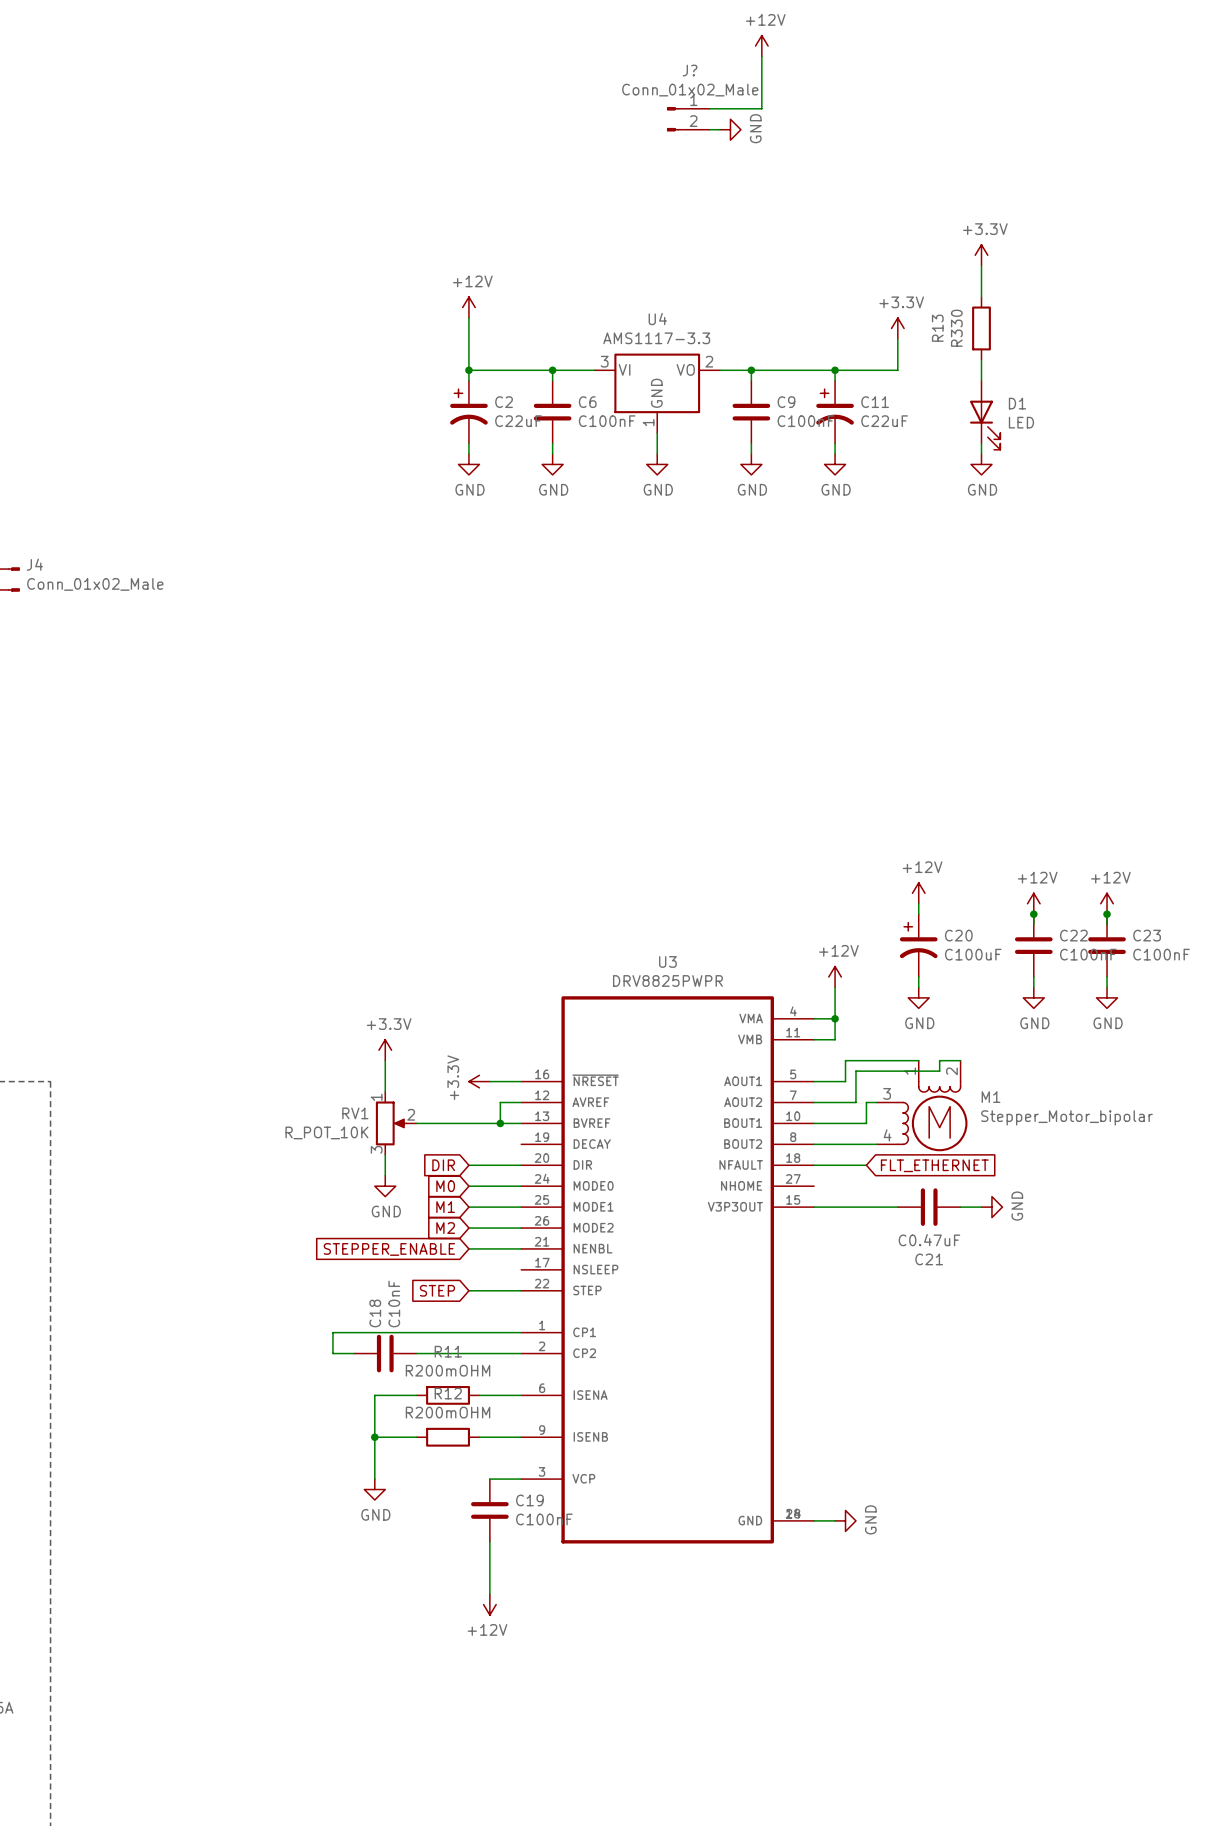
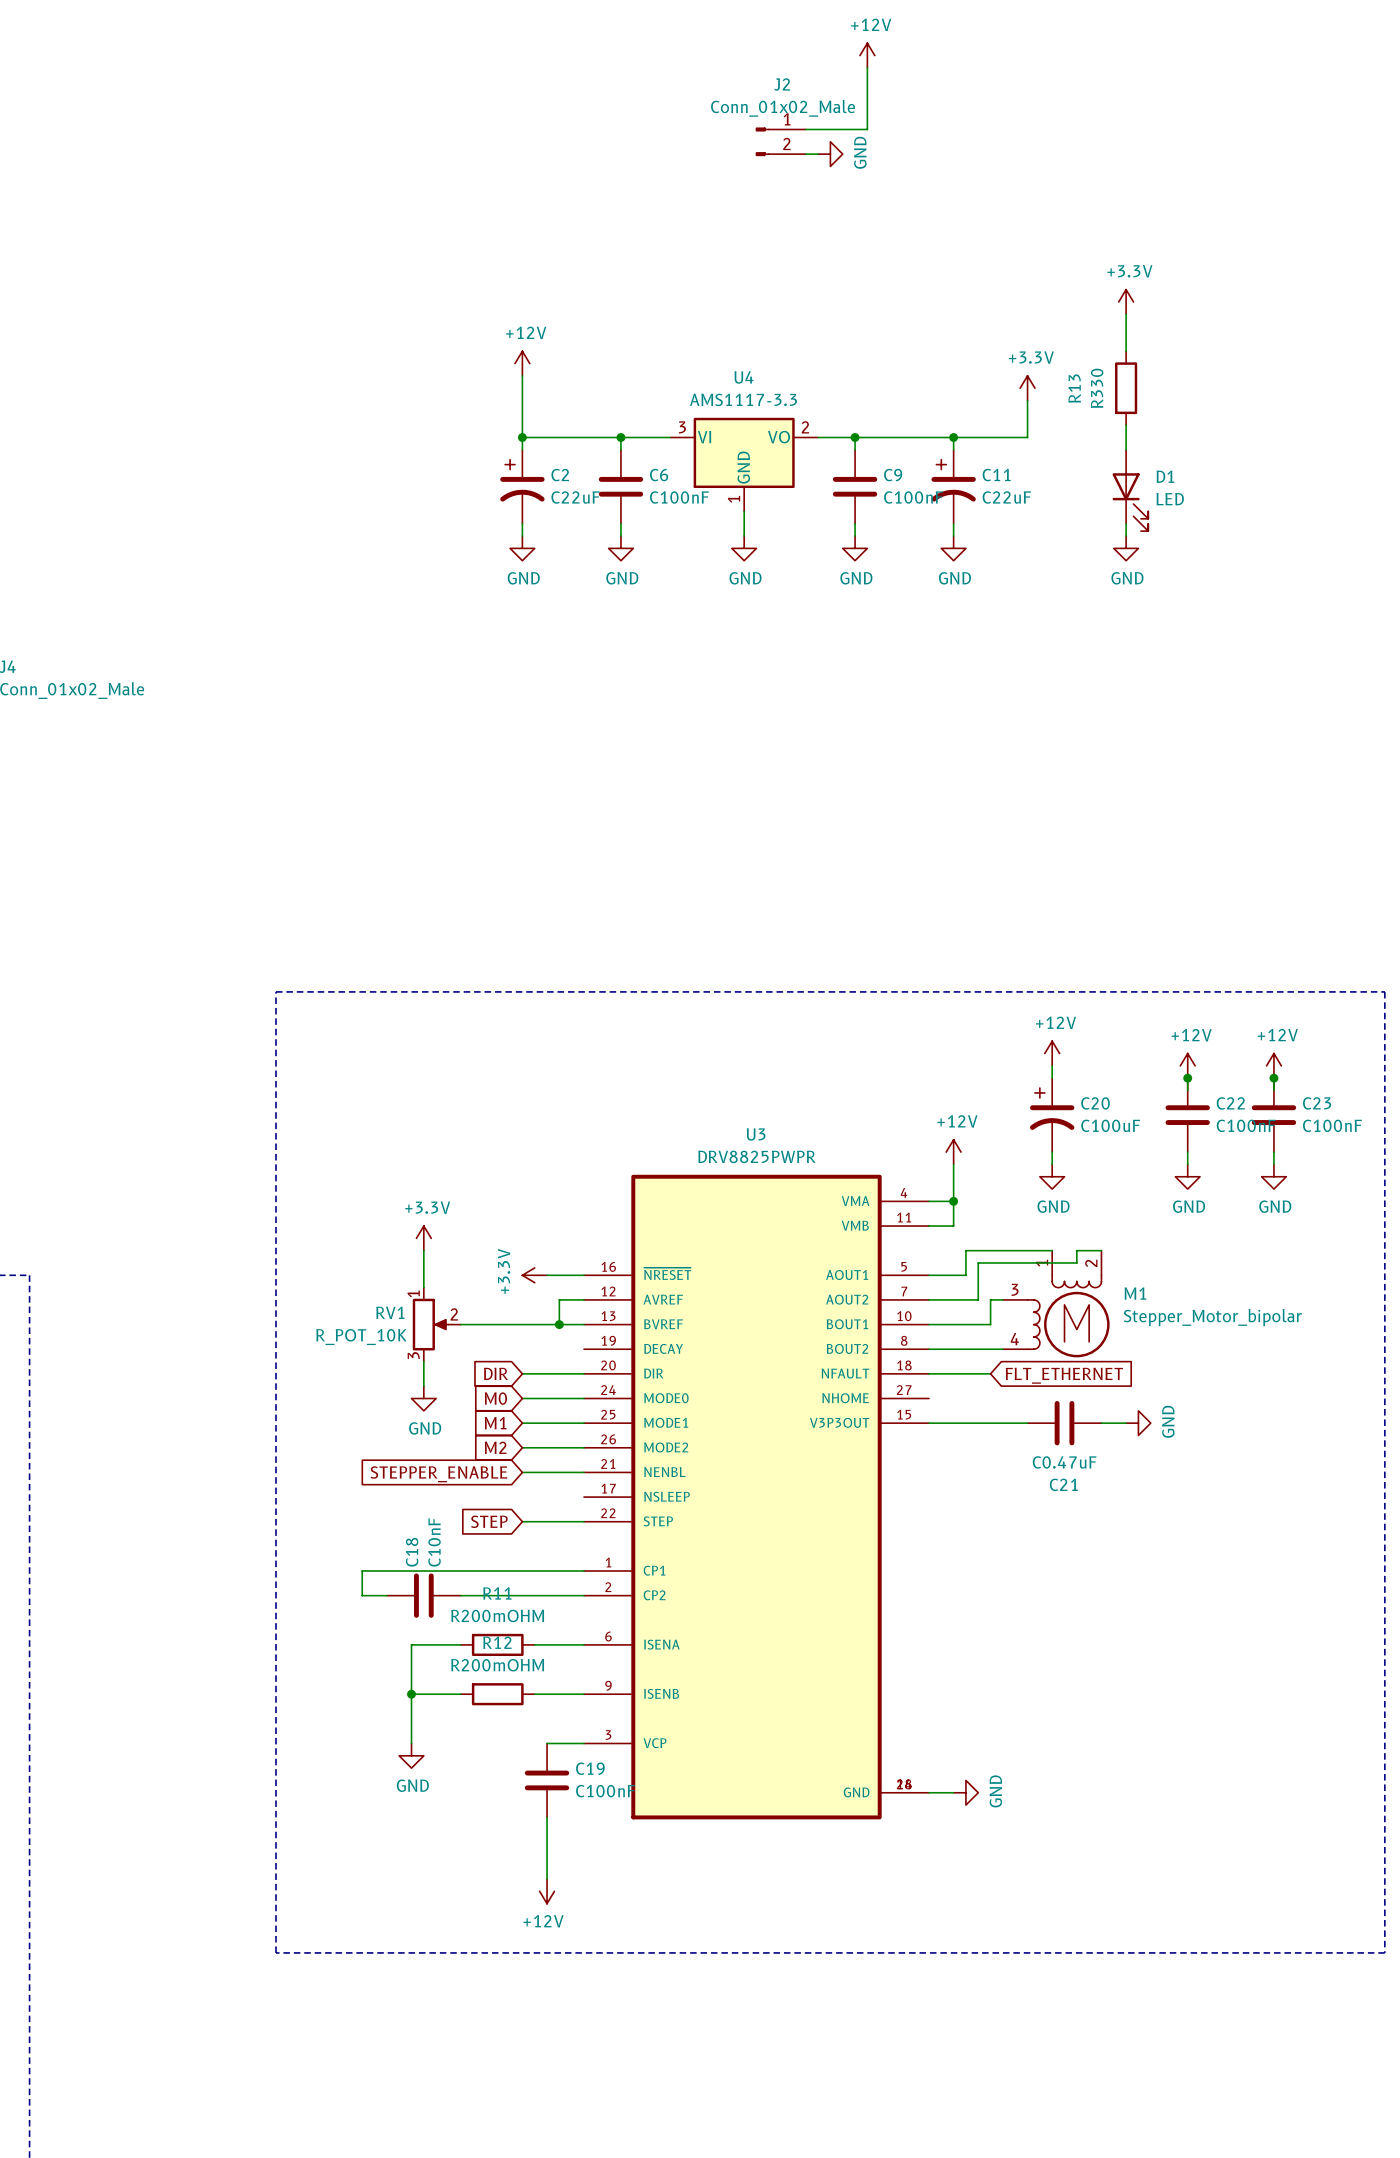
J? name: J? (690, 70) -> J2 (782, 84)
line: none -> (275, 991) (1384, 991) (1384, 1952) (275, 1952) (275, 991)

